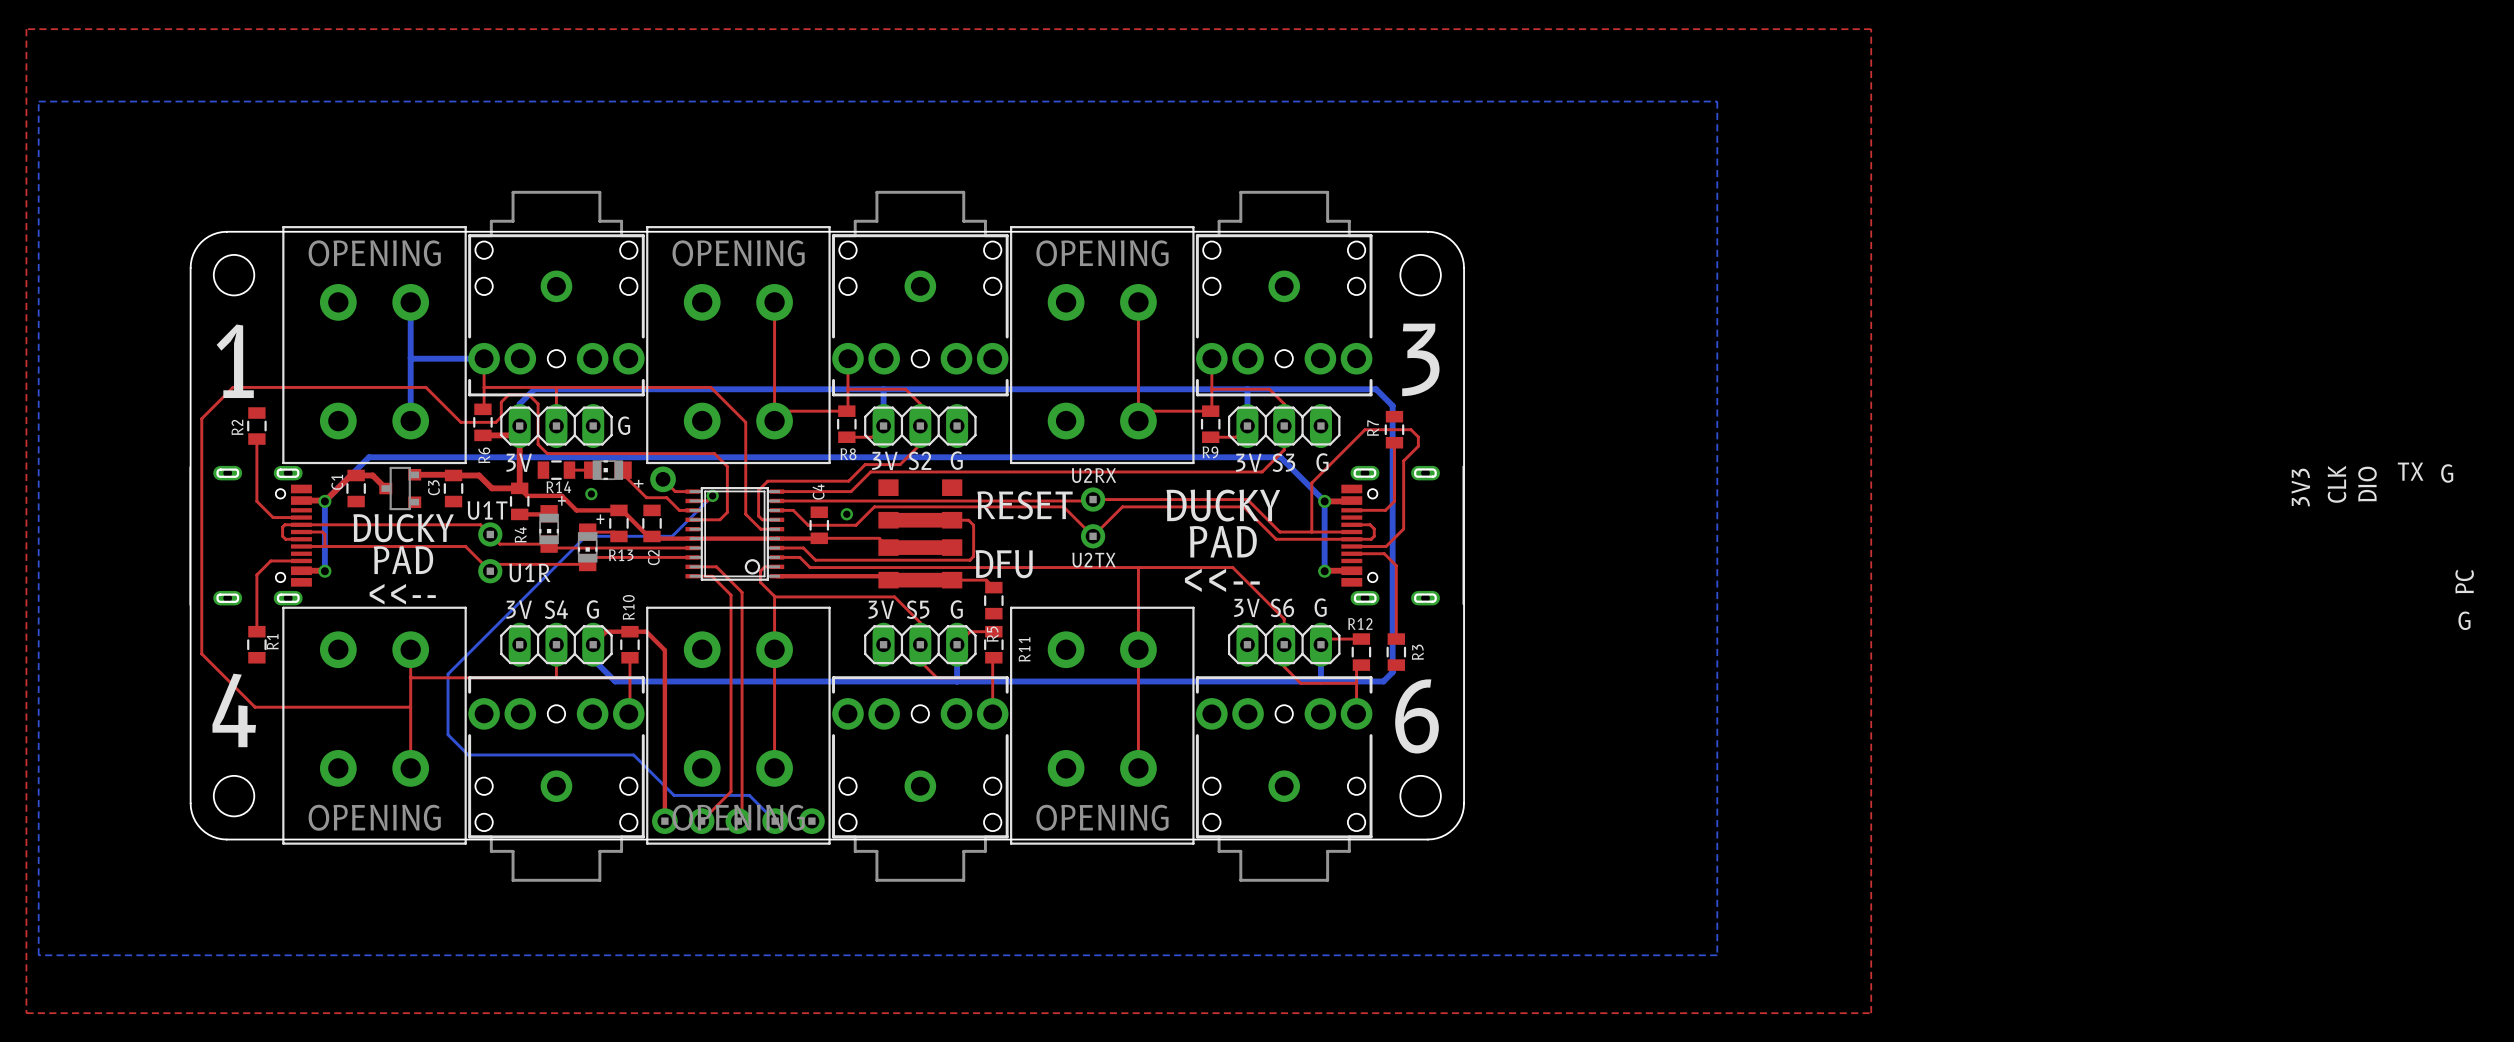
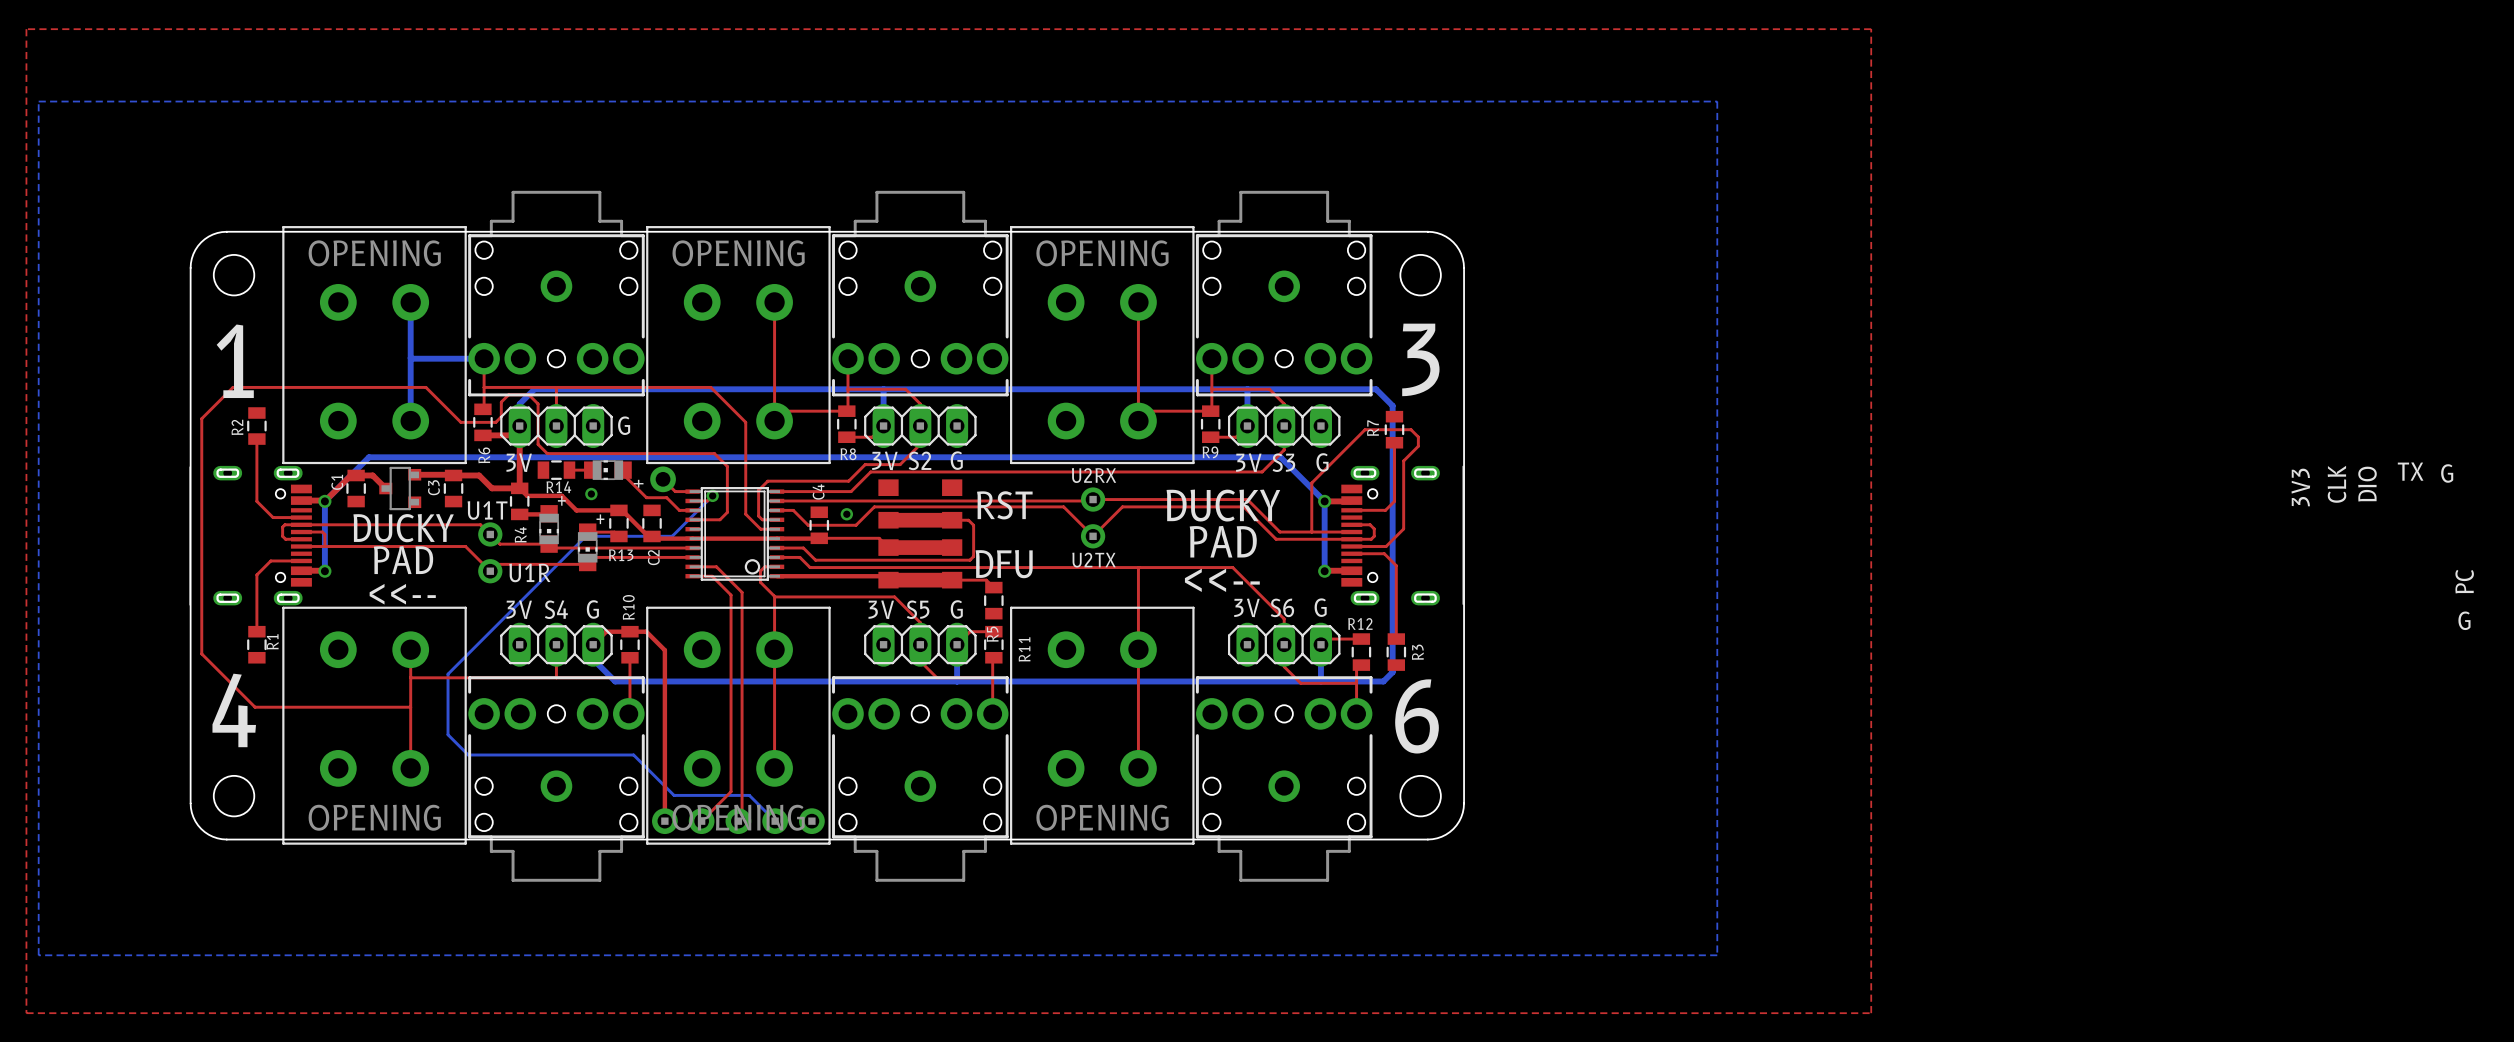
text: RESET (1025, 505) -> RST (1004, 505)

